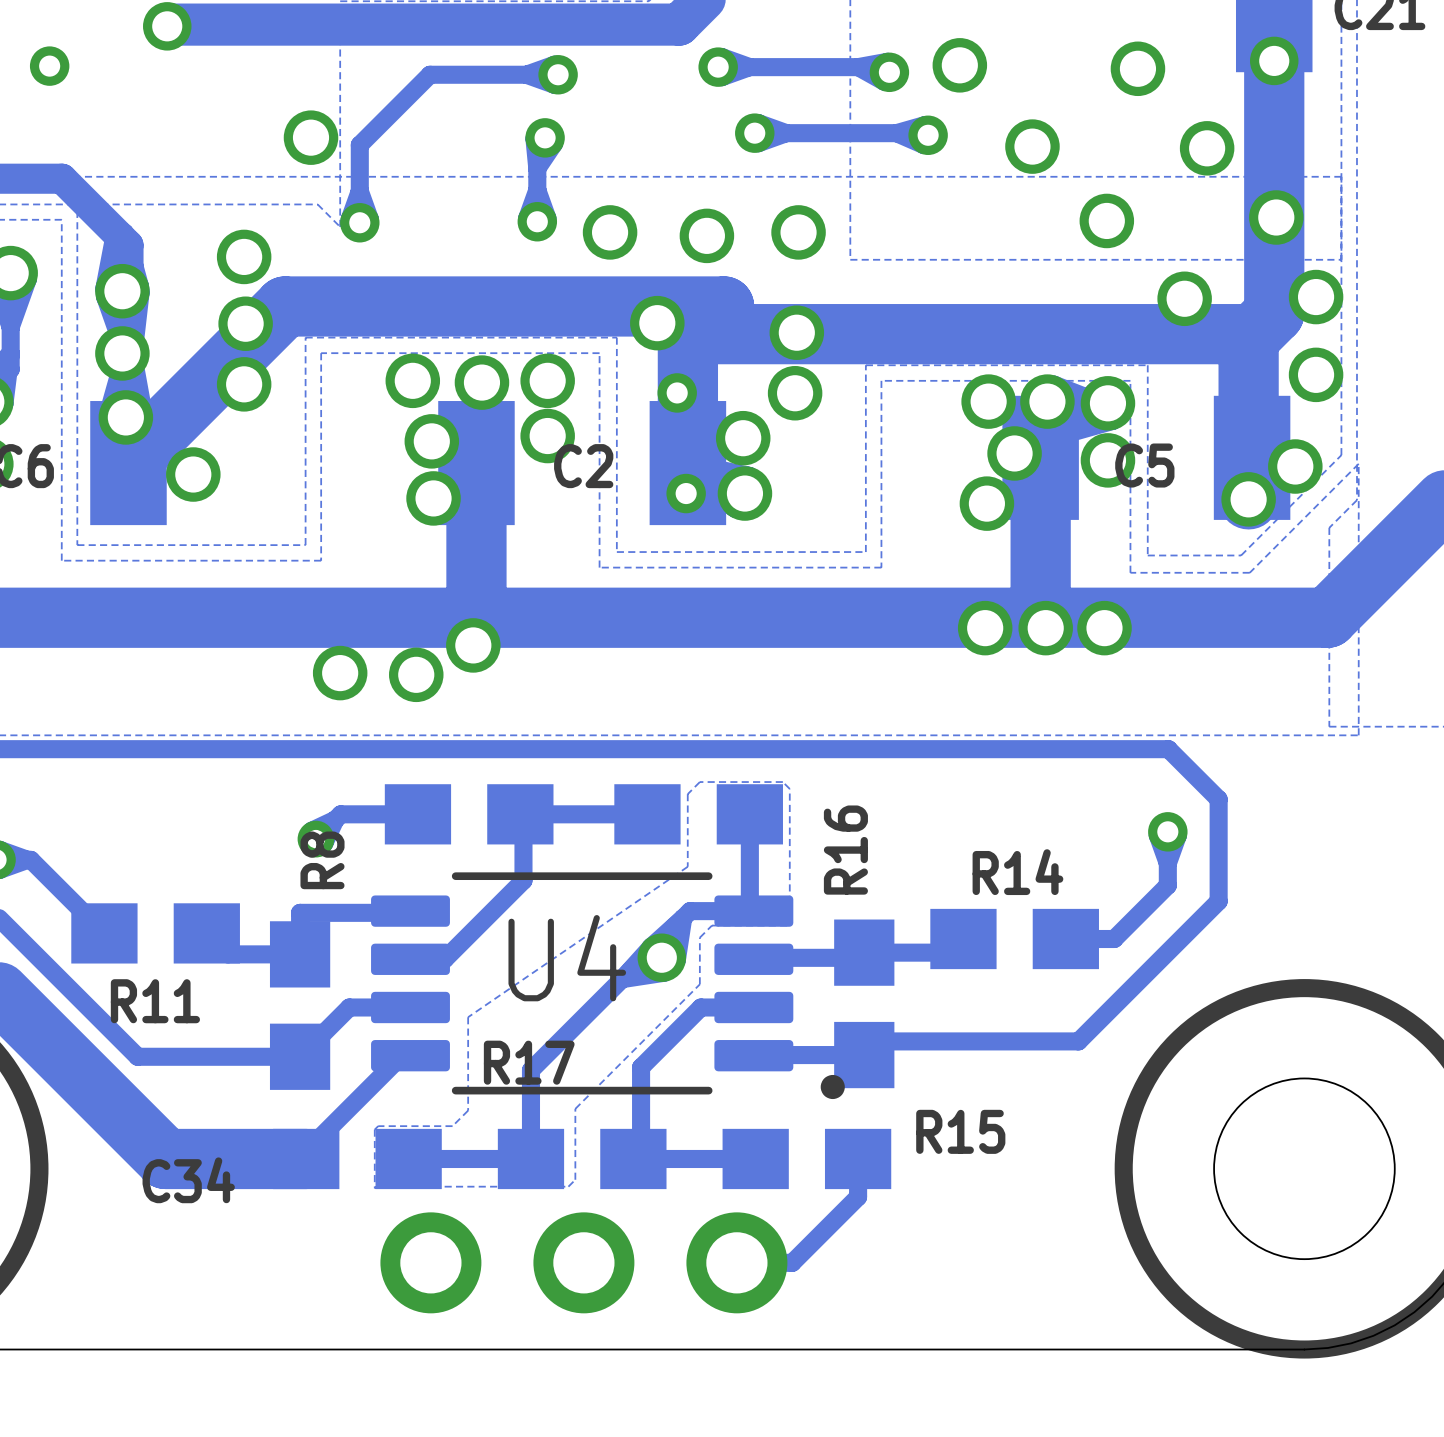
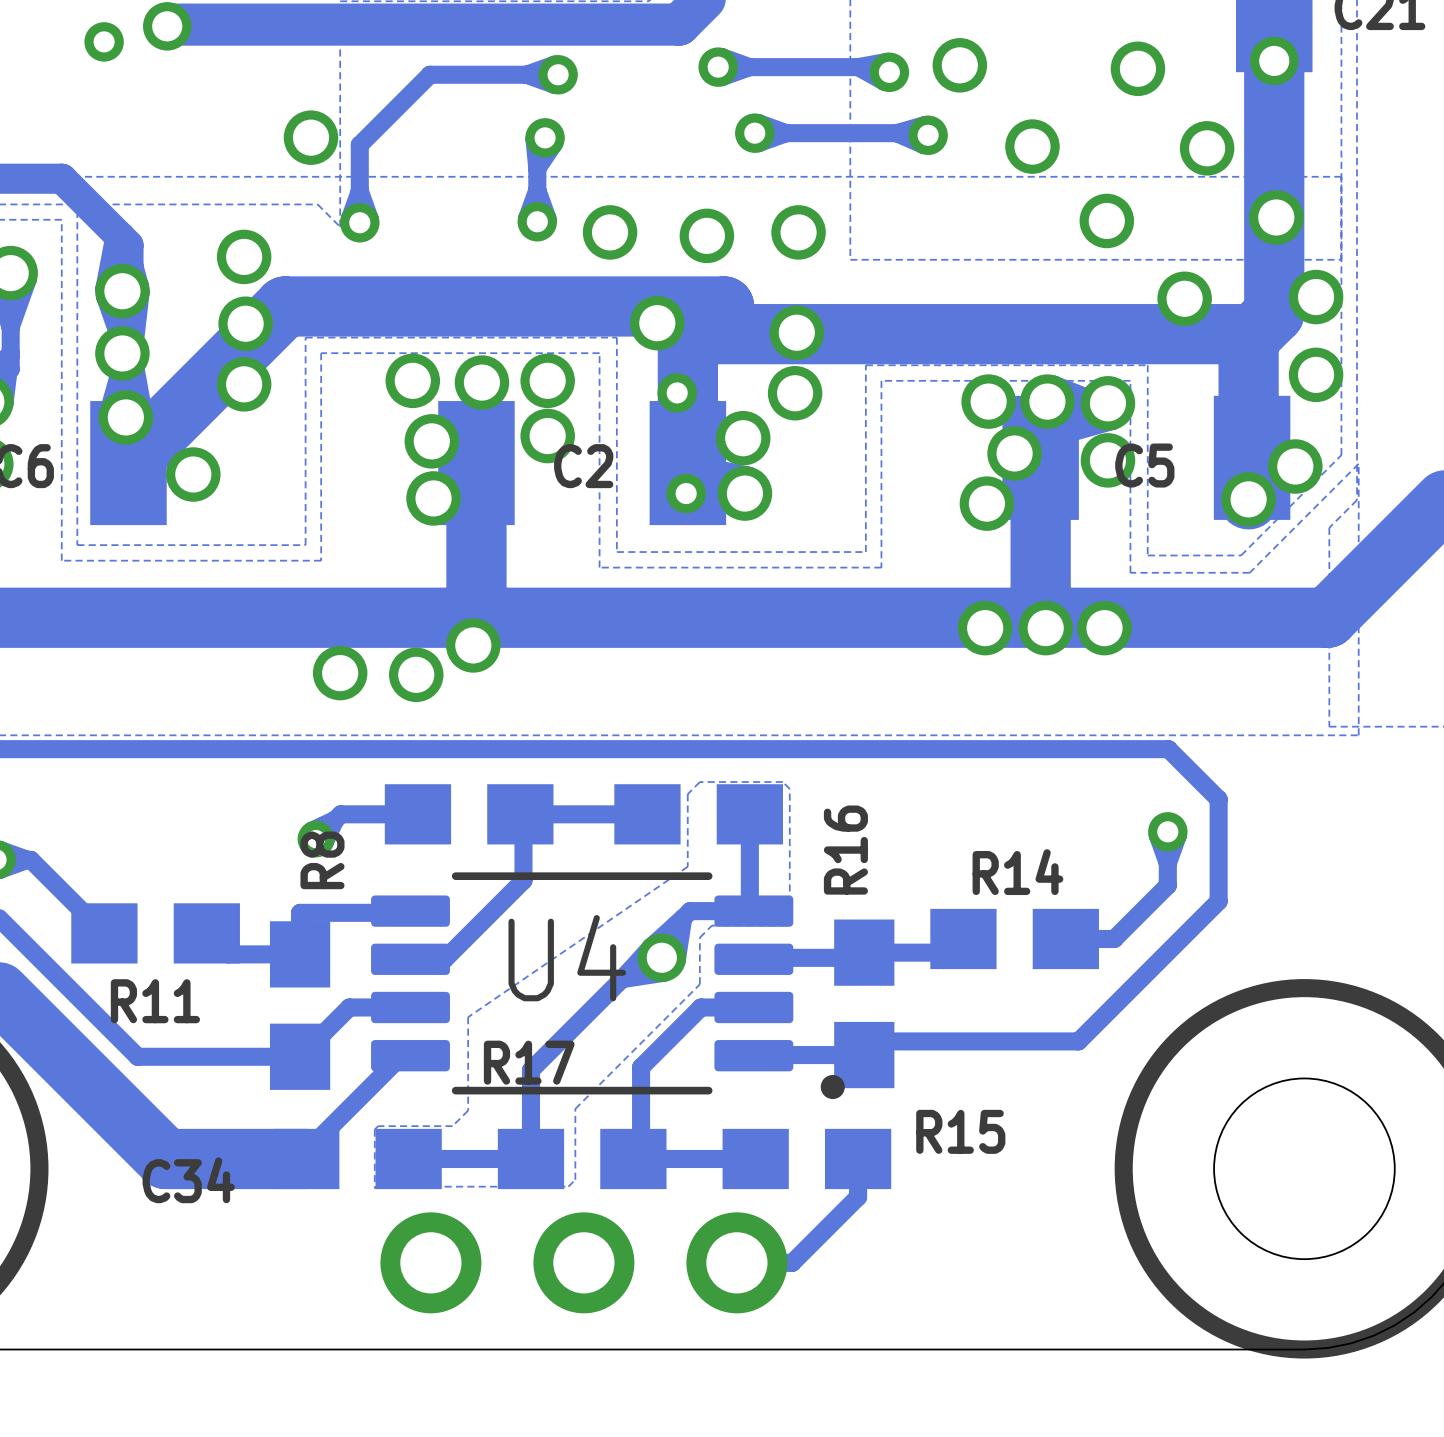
via position: (49, 66) -> (104, 41)

